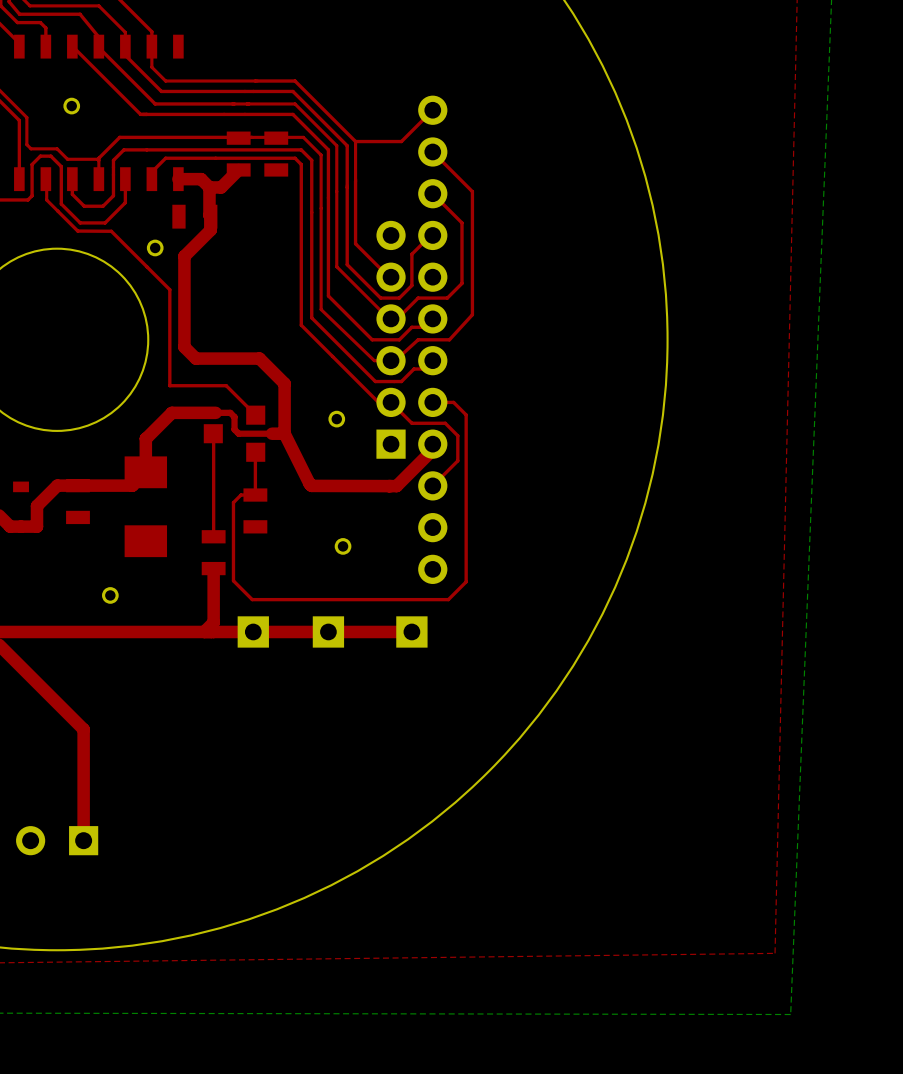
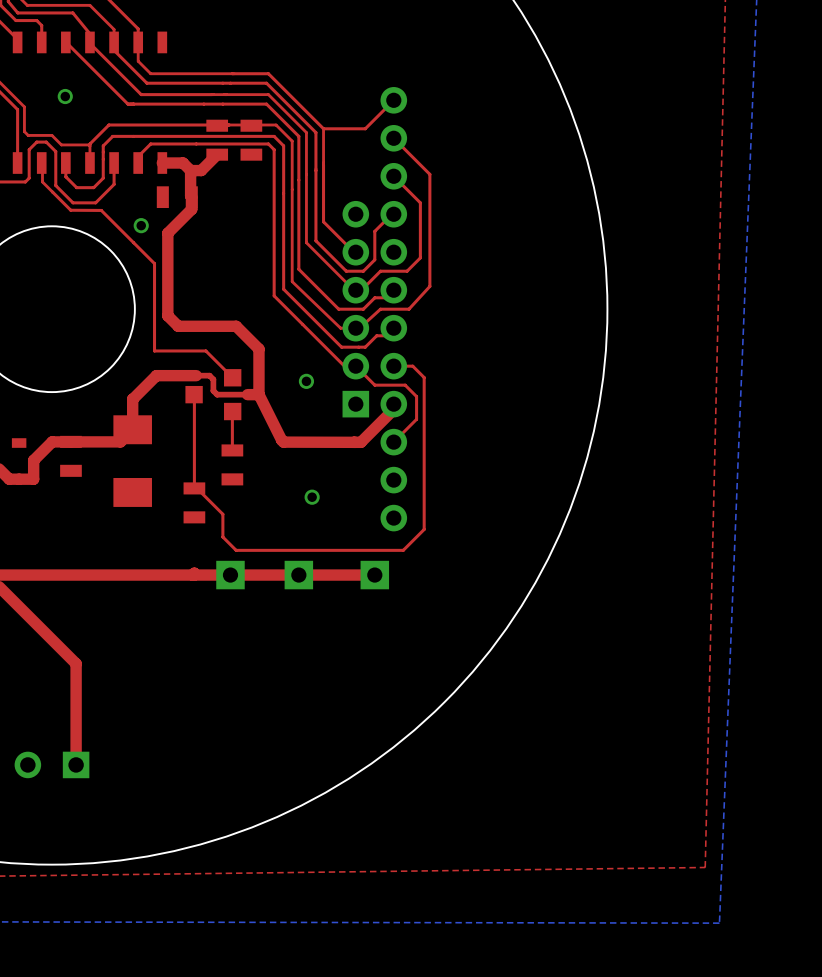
top track: (255, 495) (241, 495) (233, 502) (233, 580) (252, 599) (448, 599) -> (197, 488) (222, 514) (222, 537) (236, 550) (403, 550) (408, 545)
top track: (213, 568) (213, 622) (204, 631) -> none
part: (110, 595) -> none

